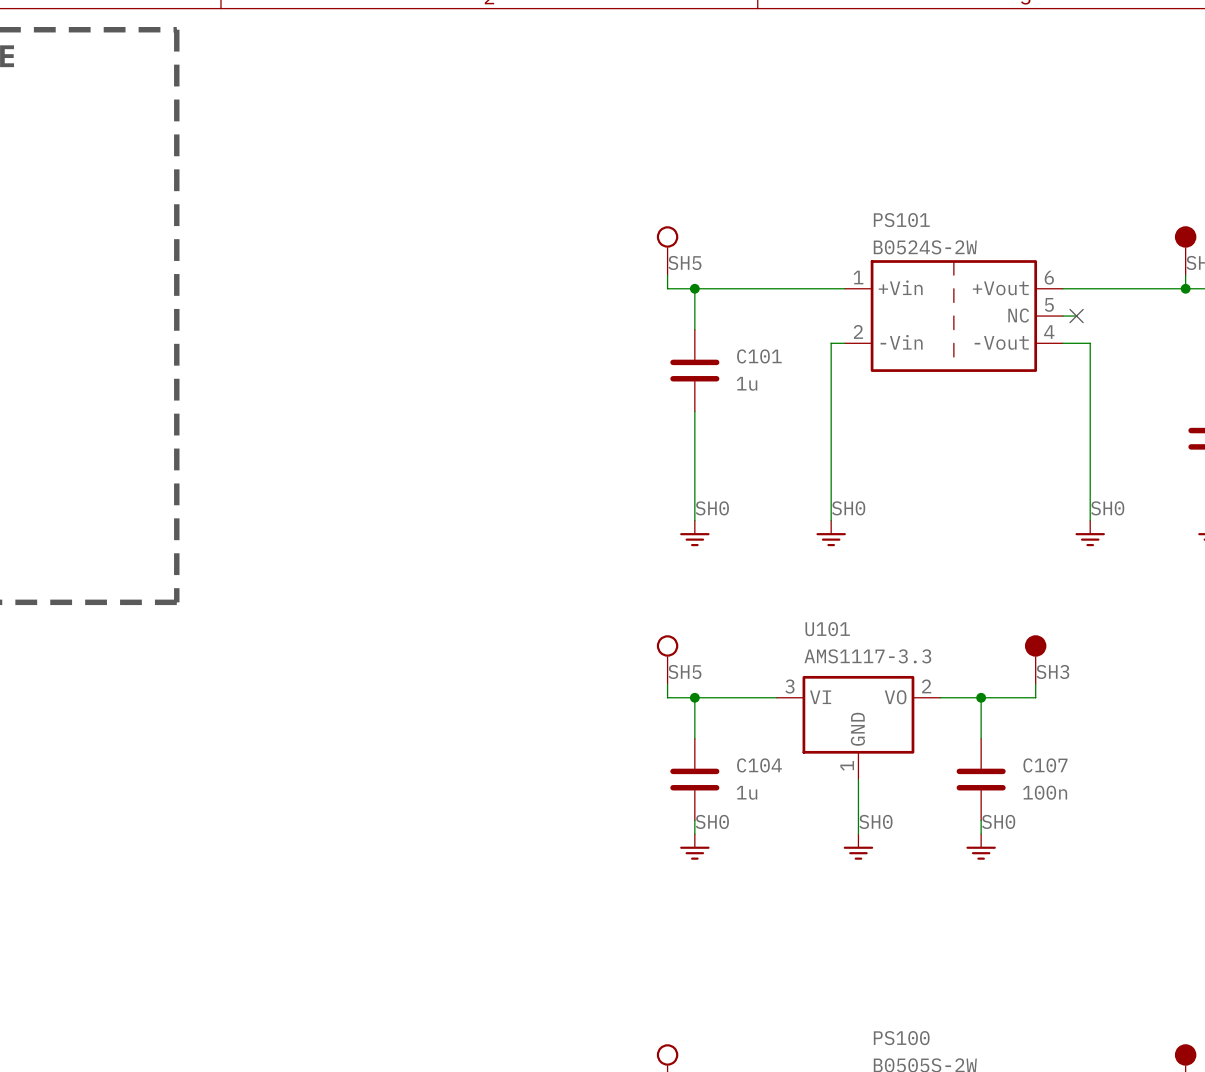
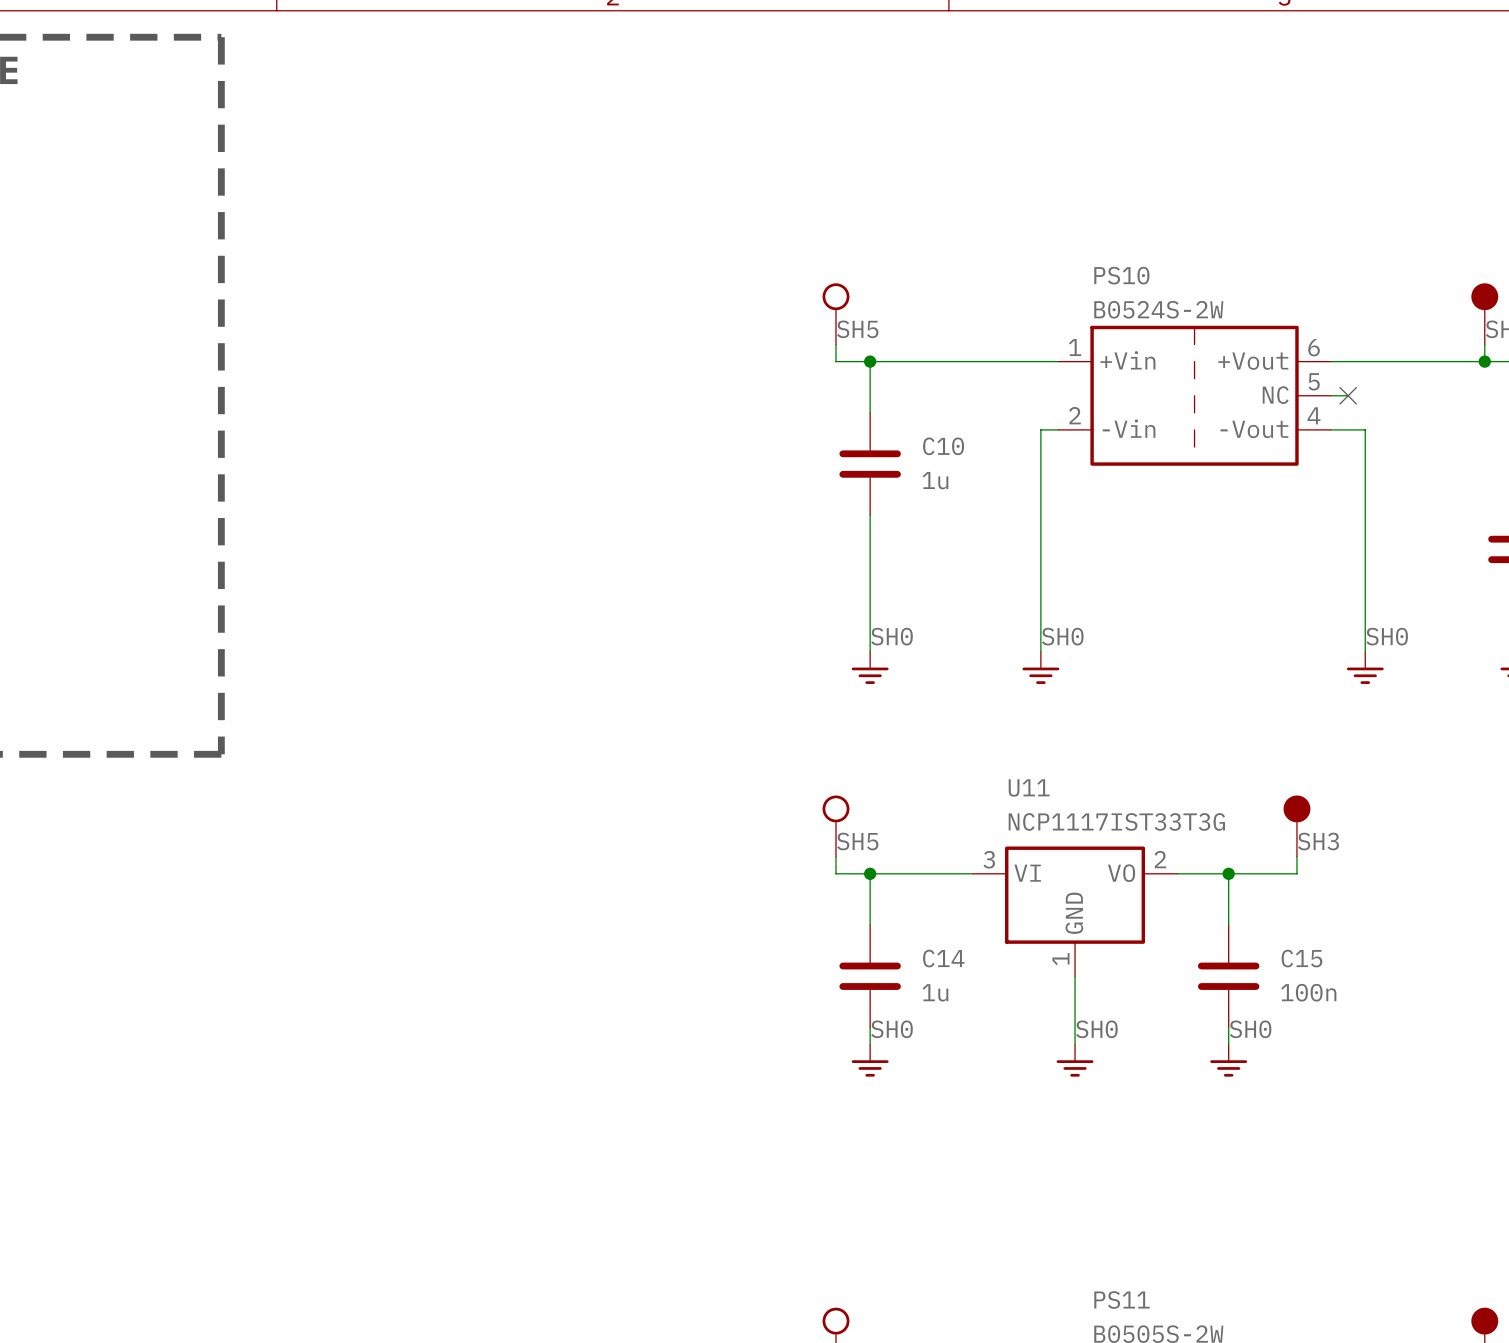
PS101 name: PS101 (901, 220) -> PS10 (1121, 275)
C101 name: C101 (759, 356) -> C10 (943, 446)
U101 name: U101 (827, 629) -> U11 (1029, 787)
U101 value: AMS1117-3.3 (867, 656) -> NCP1117IST33T3G (1116, 821)
C104 name: C104 (759, 765) -> C14 (943, 958)
C107 name: C107 (1045, 765) -> C15 (1301, 958)
PS100 name: PS100 (901, 1038) -> PS11 (1121, 1300)

